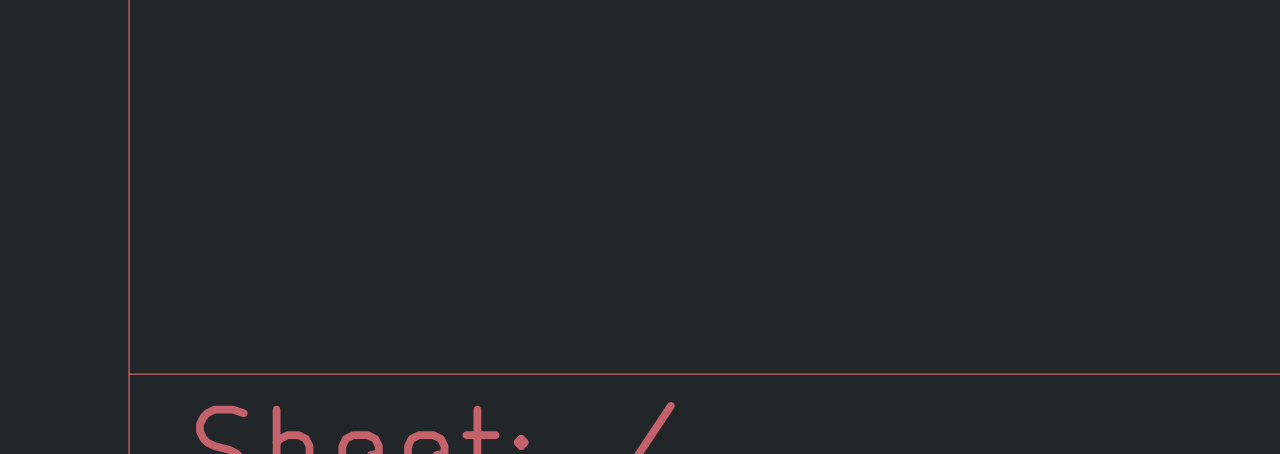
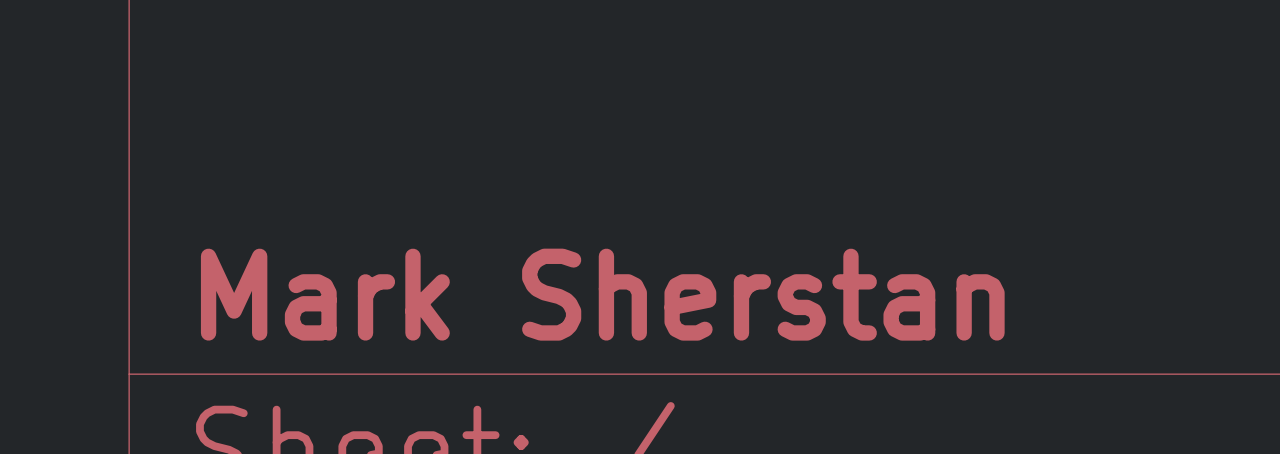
title block: none -> Mark Sherstan (602, 294)

